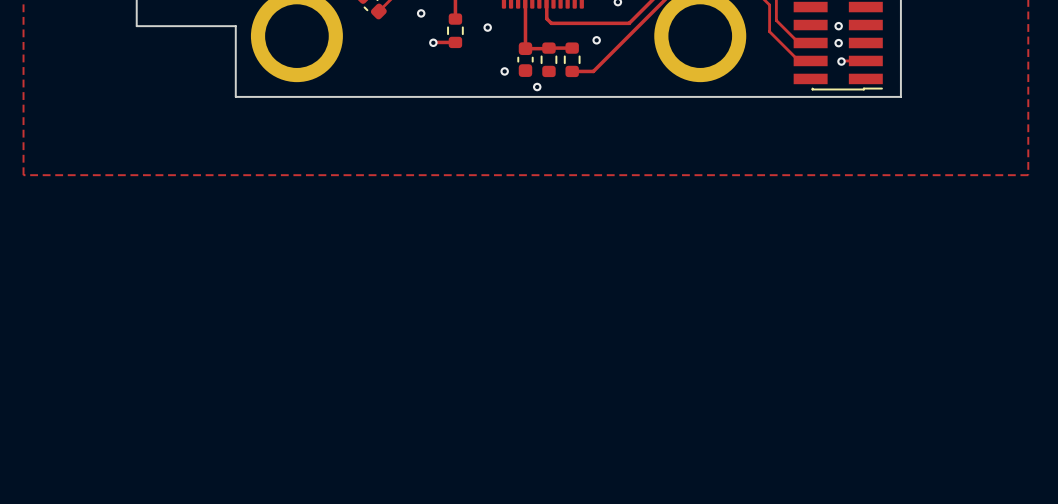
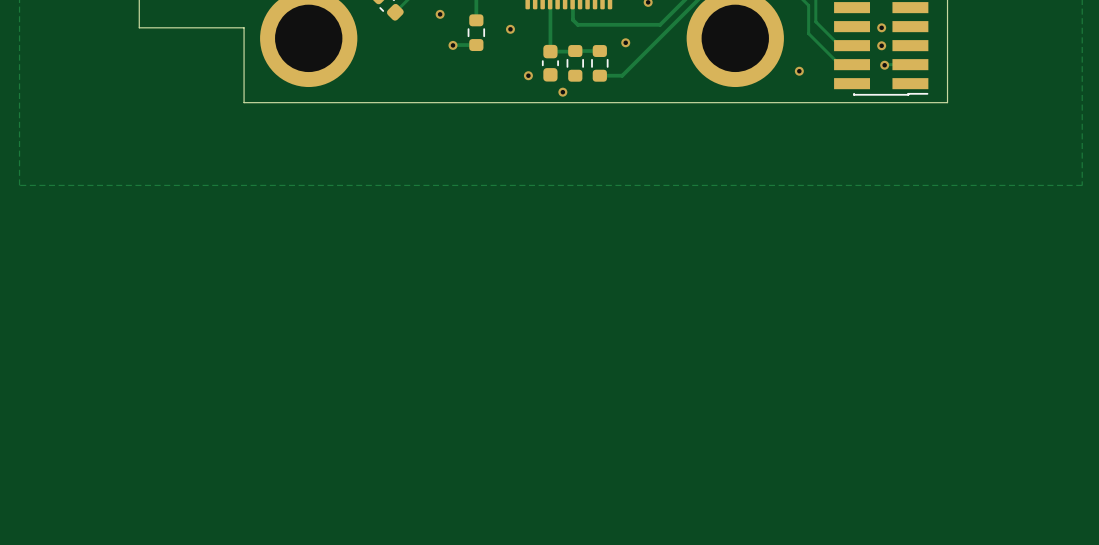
via: none -> (799, 71)

